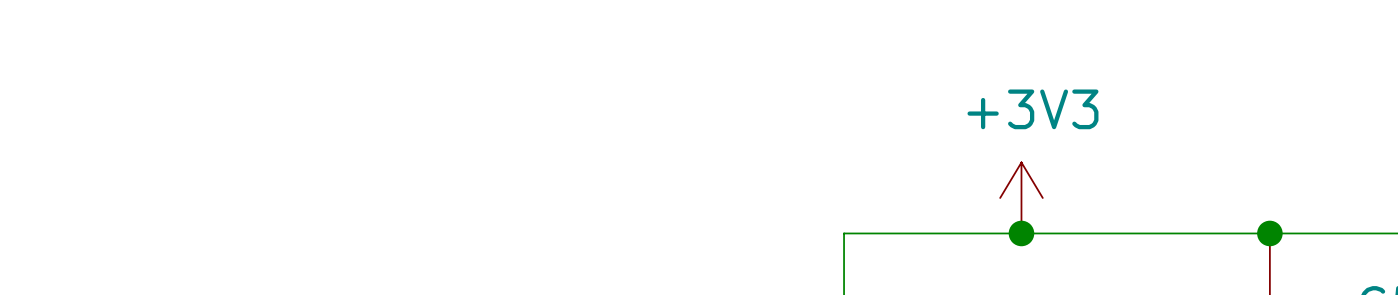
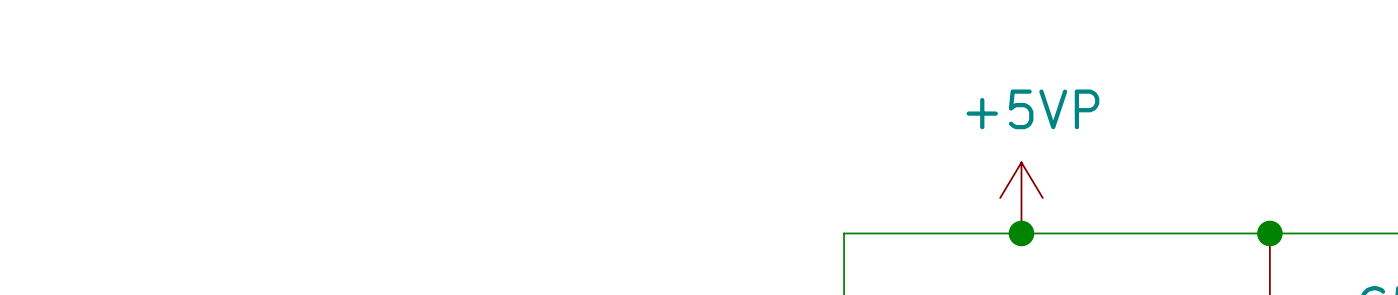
power symbol: +3V3 (1021, 197) -> +5VP (1021, 197)

